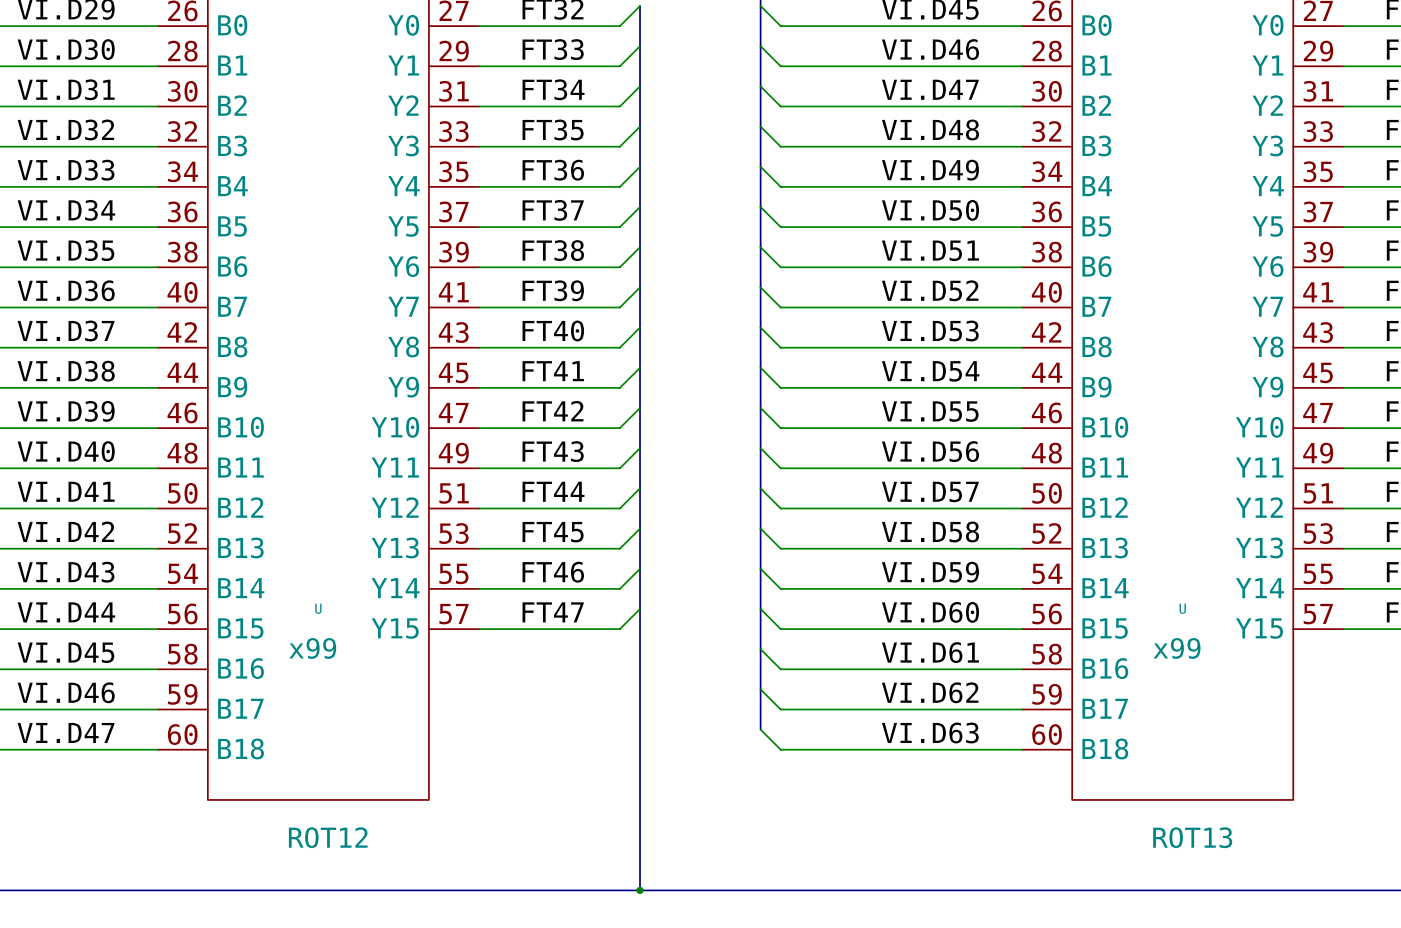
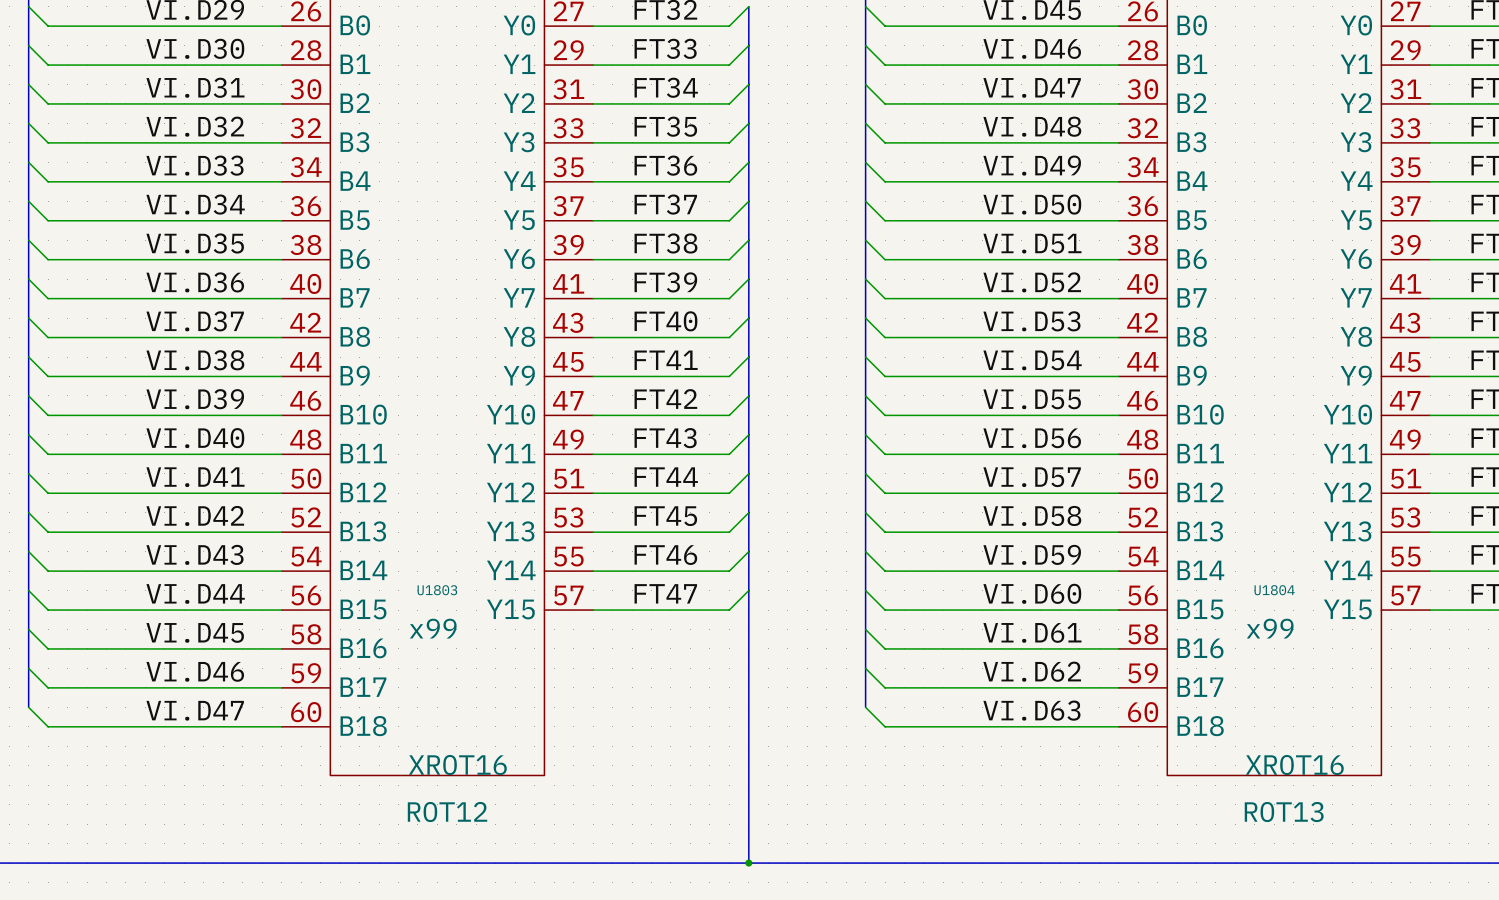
U name: U (318, 608) -> U1803 (437, 590)
U name: U (1182, 608) -> U1804 (1274, 590)
U value: none -> XROT16 (457, 765)
U value: none -> XROT16 (1294, 765)

